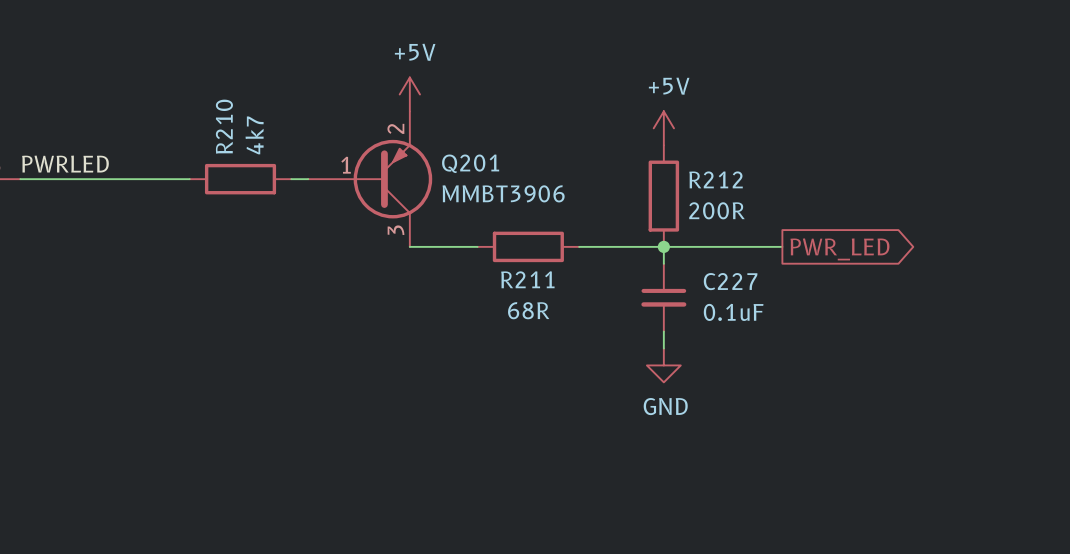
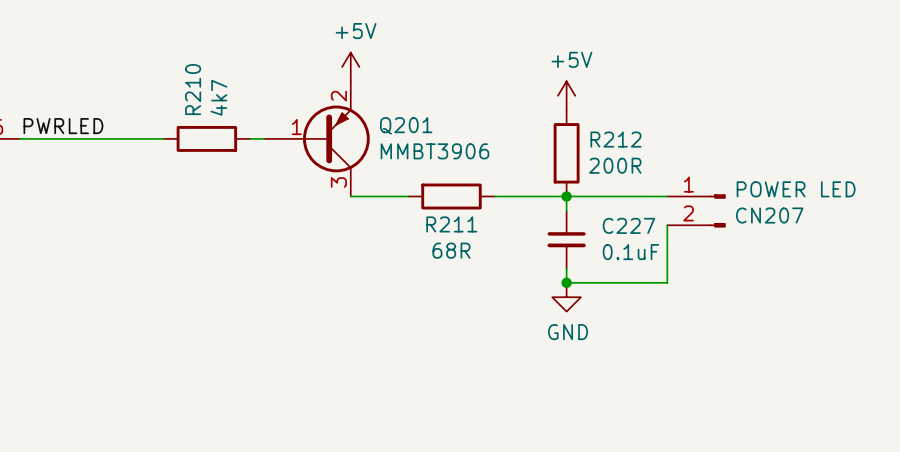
global label: PWR_LED (839, 249) -> none
CN207: none -> POWER LED (696, 210)
wire: none -> (667, 225) (667, 282) (566, 282)
junction: none -> (566, 282)

